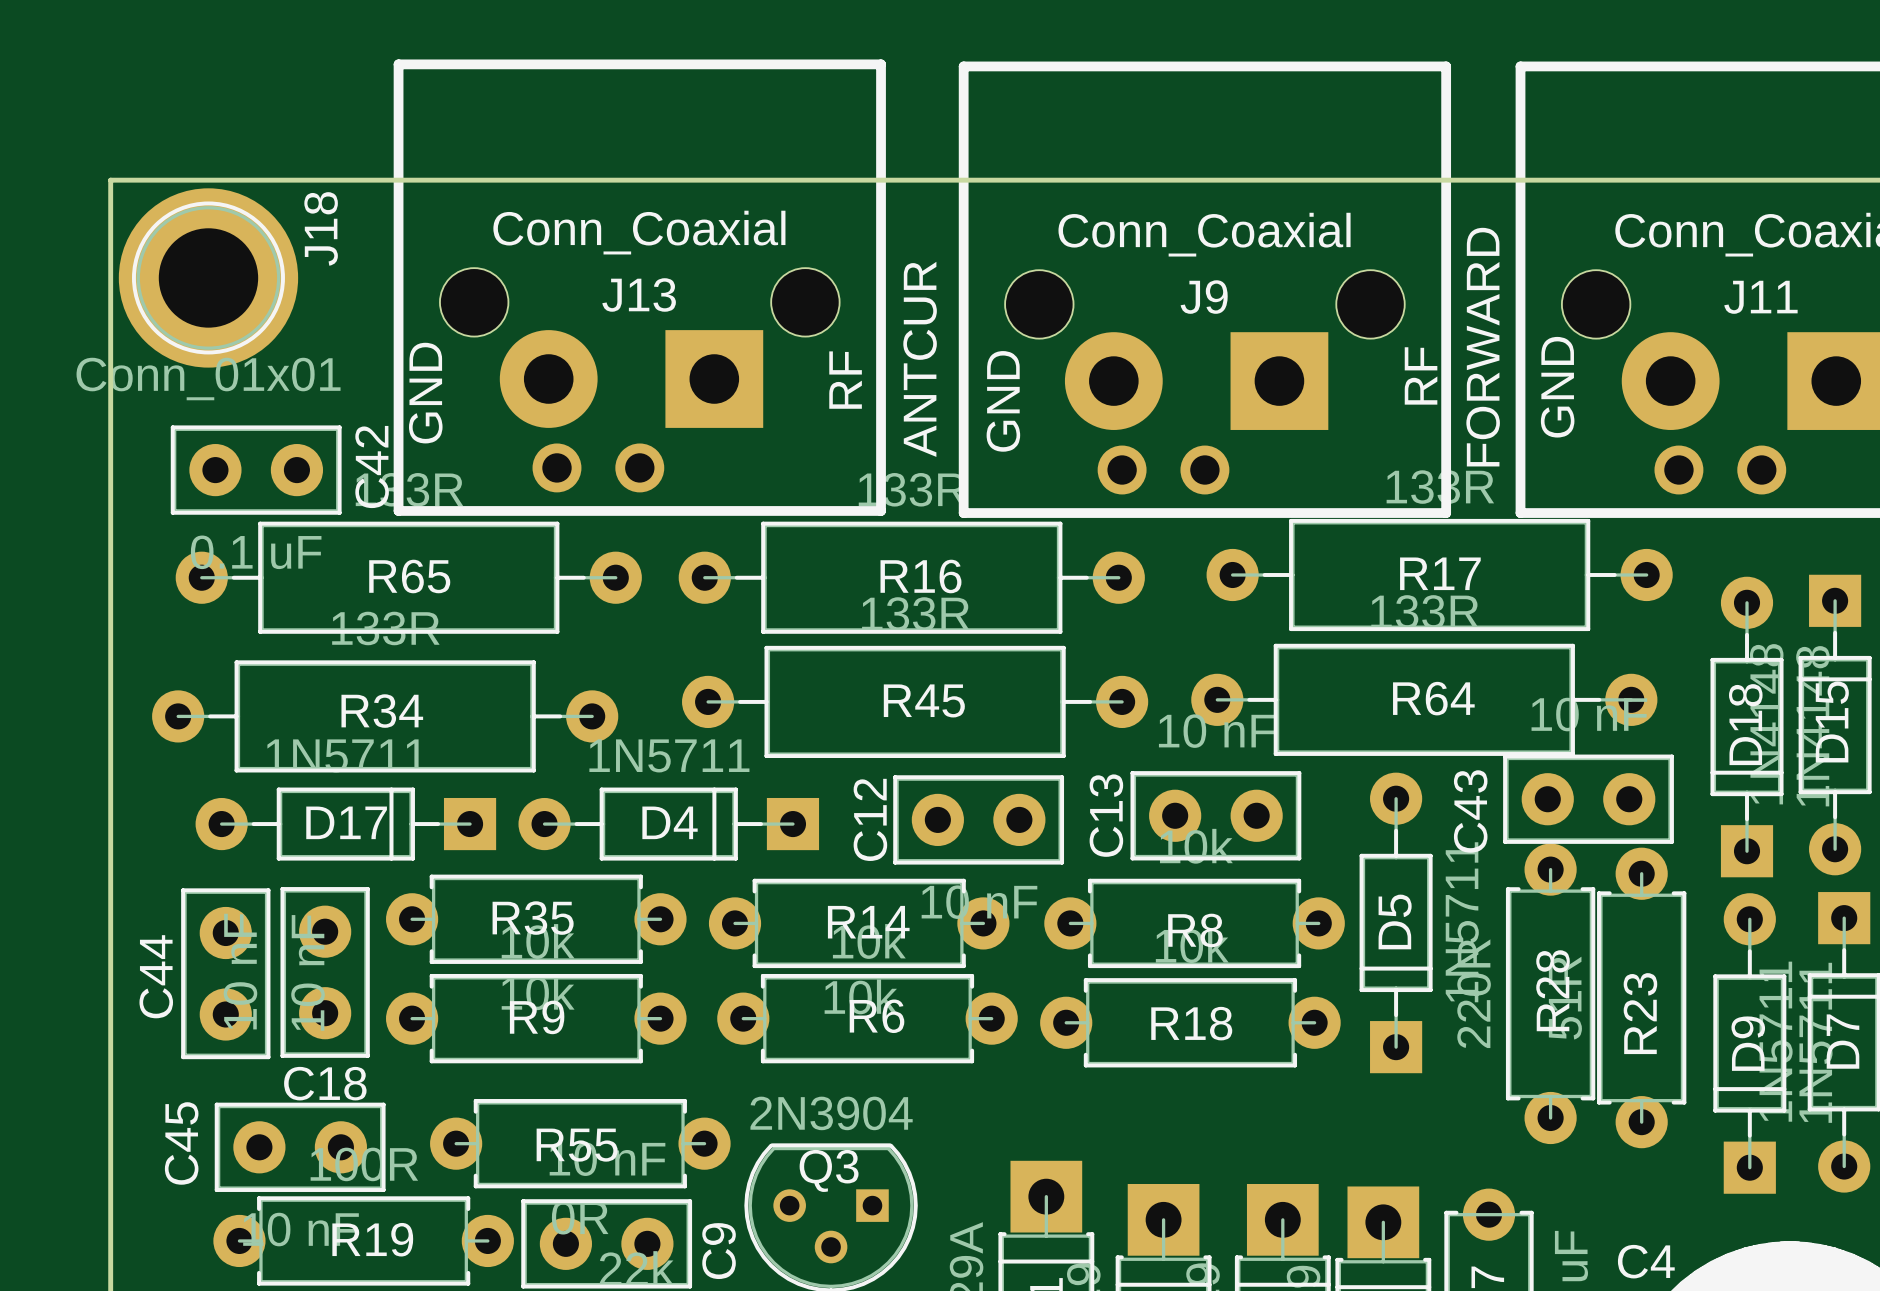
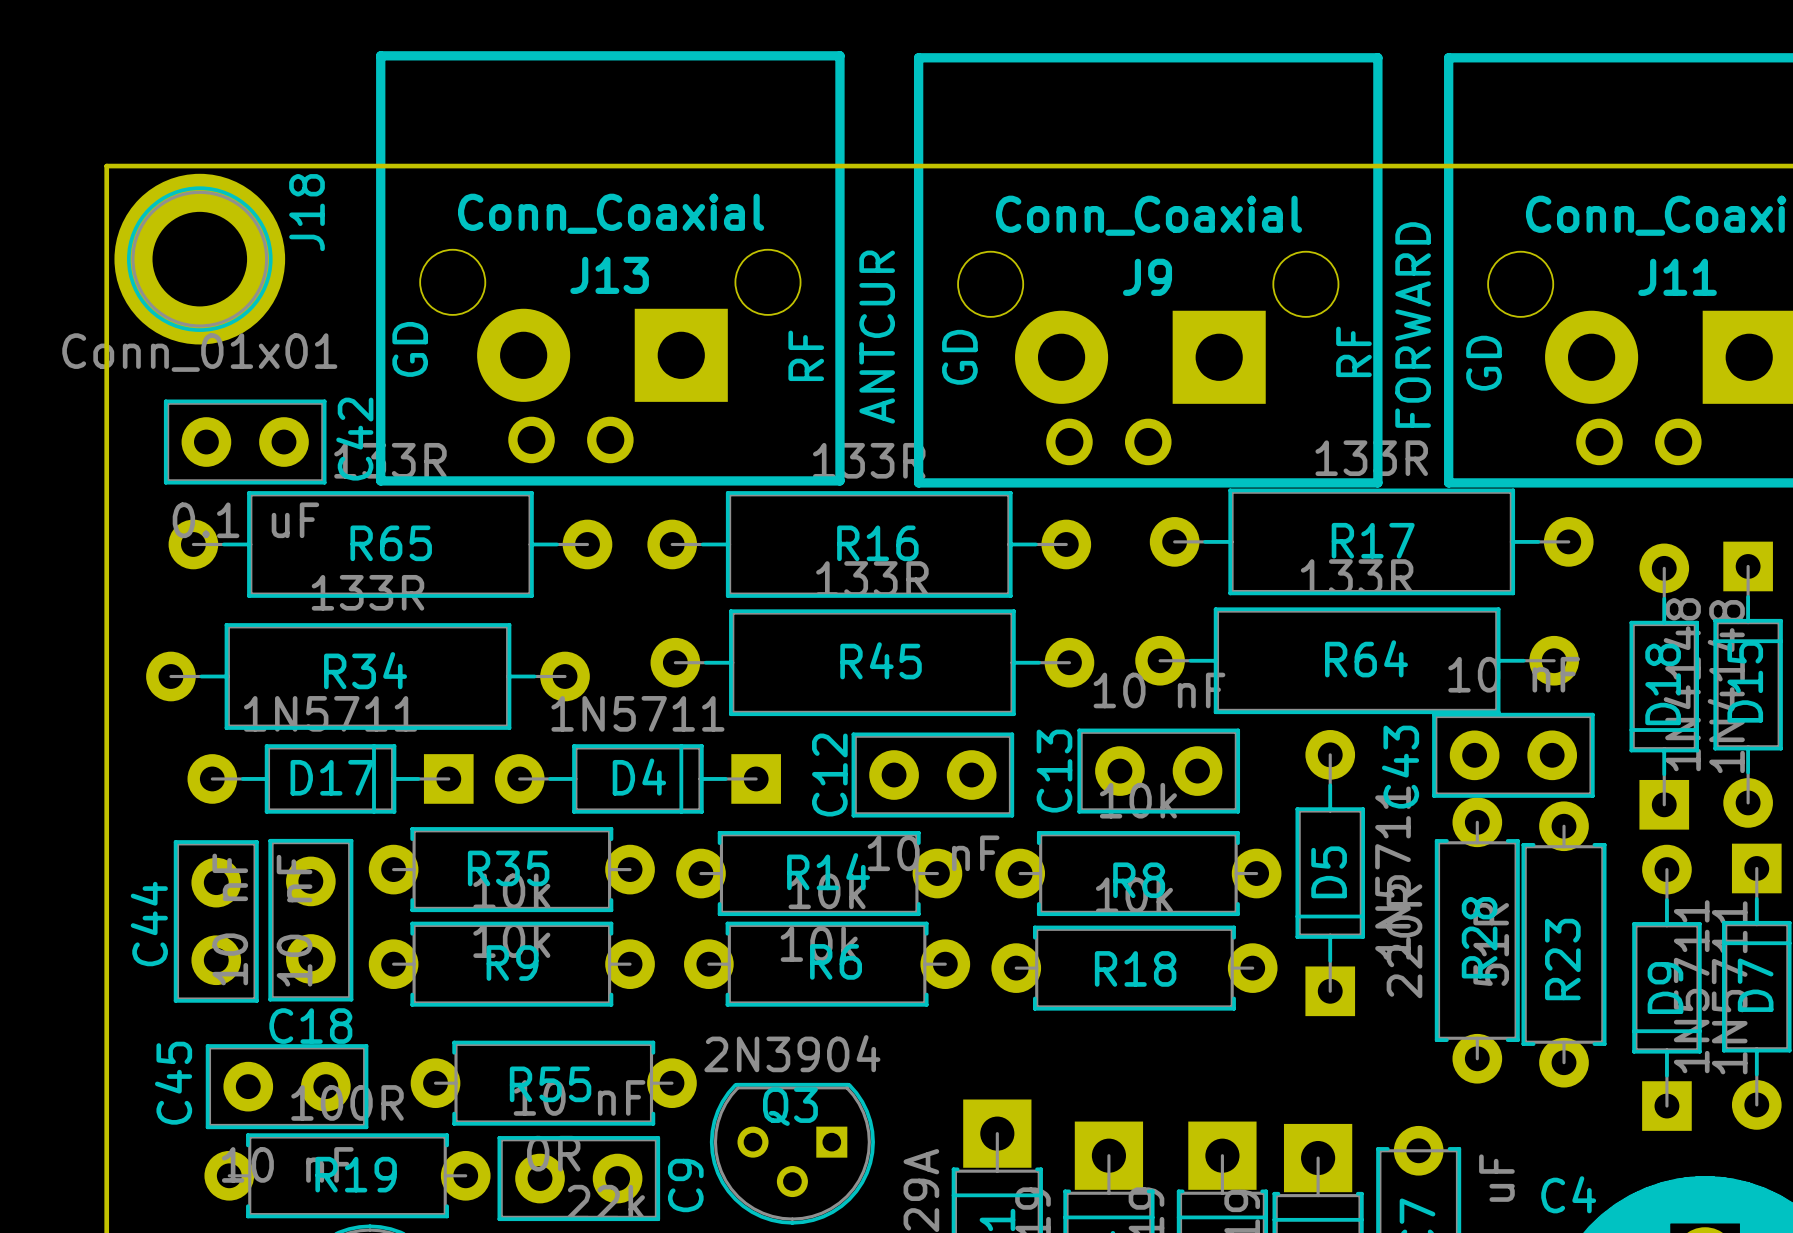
text: GND (1557, 387) -> GD (1484, 363)
text: GND (425, 393) -> GD (410, 349)
text: GND (1003, 401) -> GD (959, 357)

